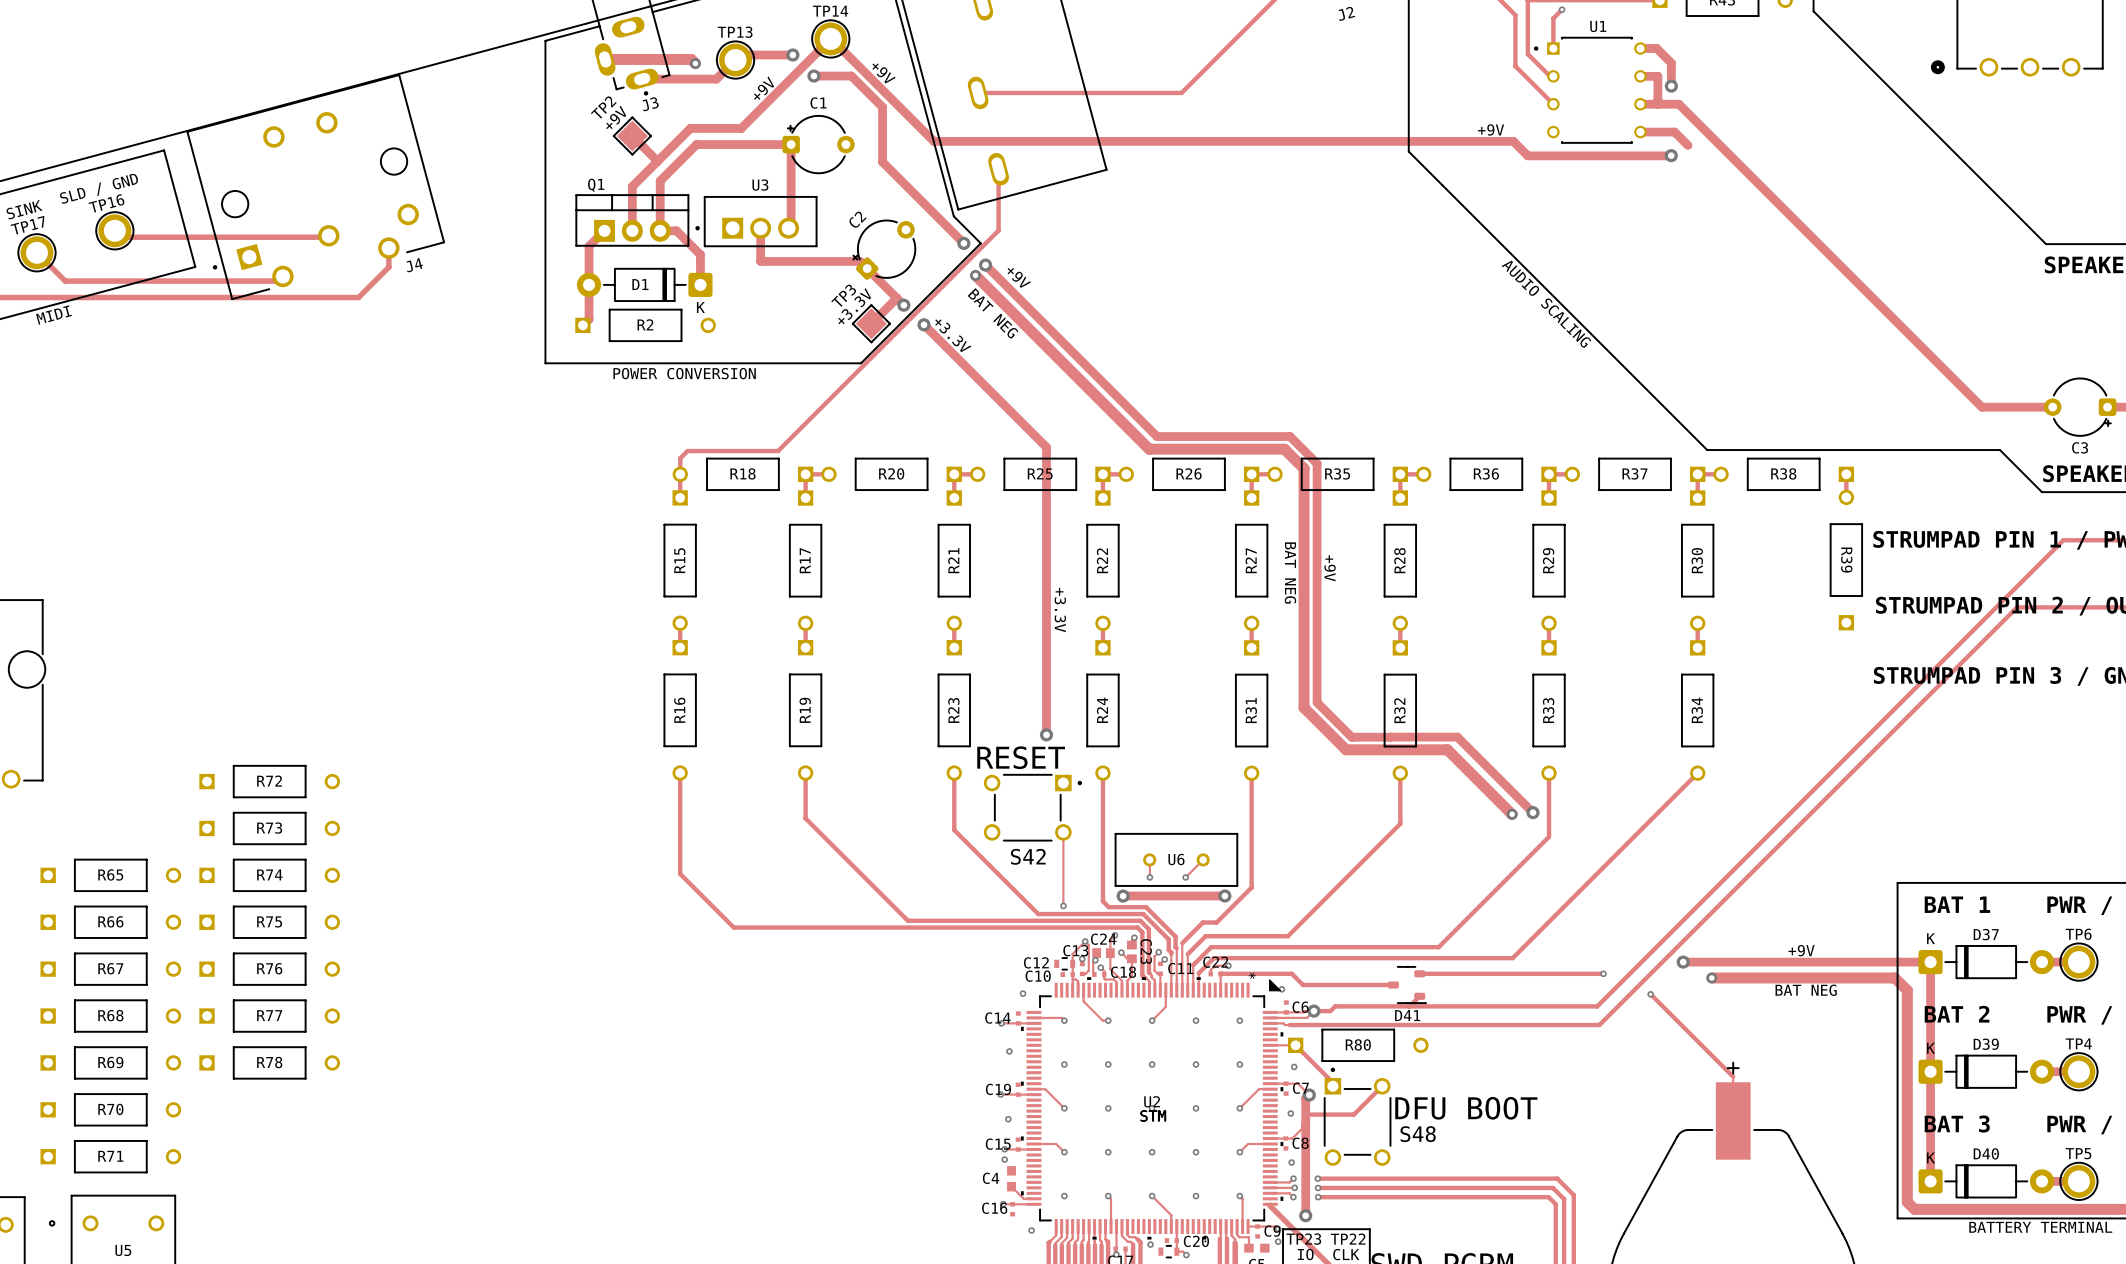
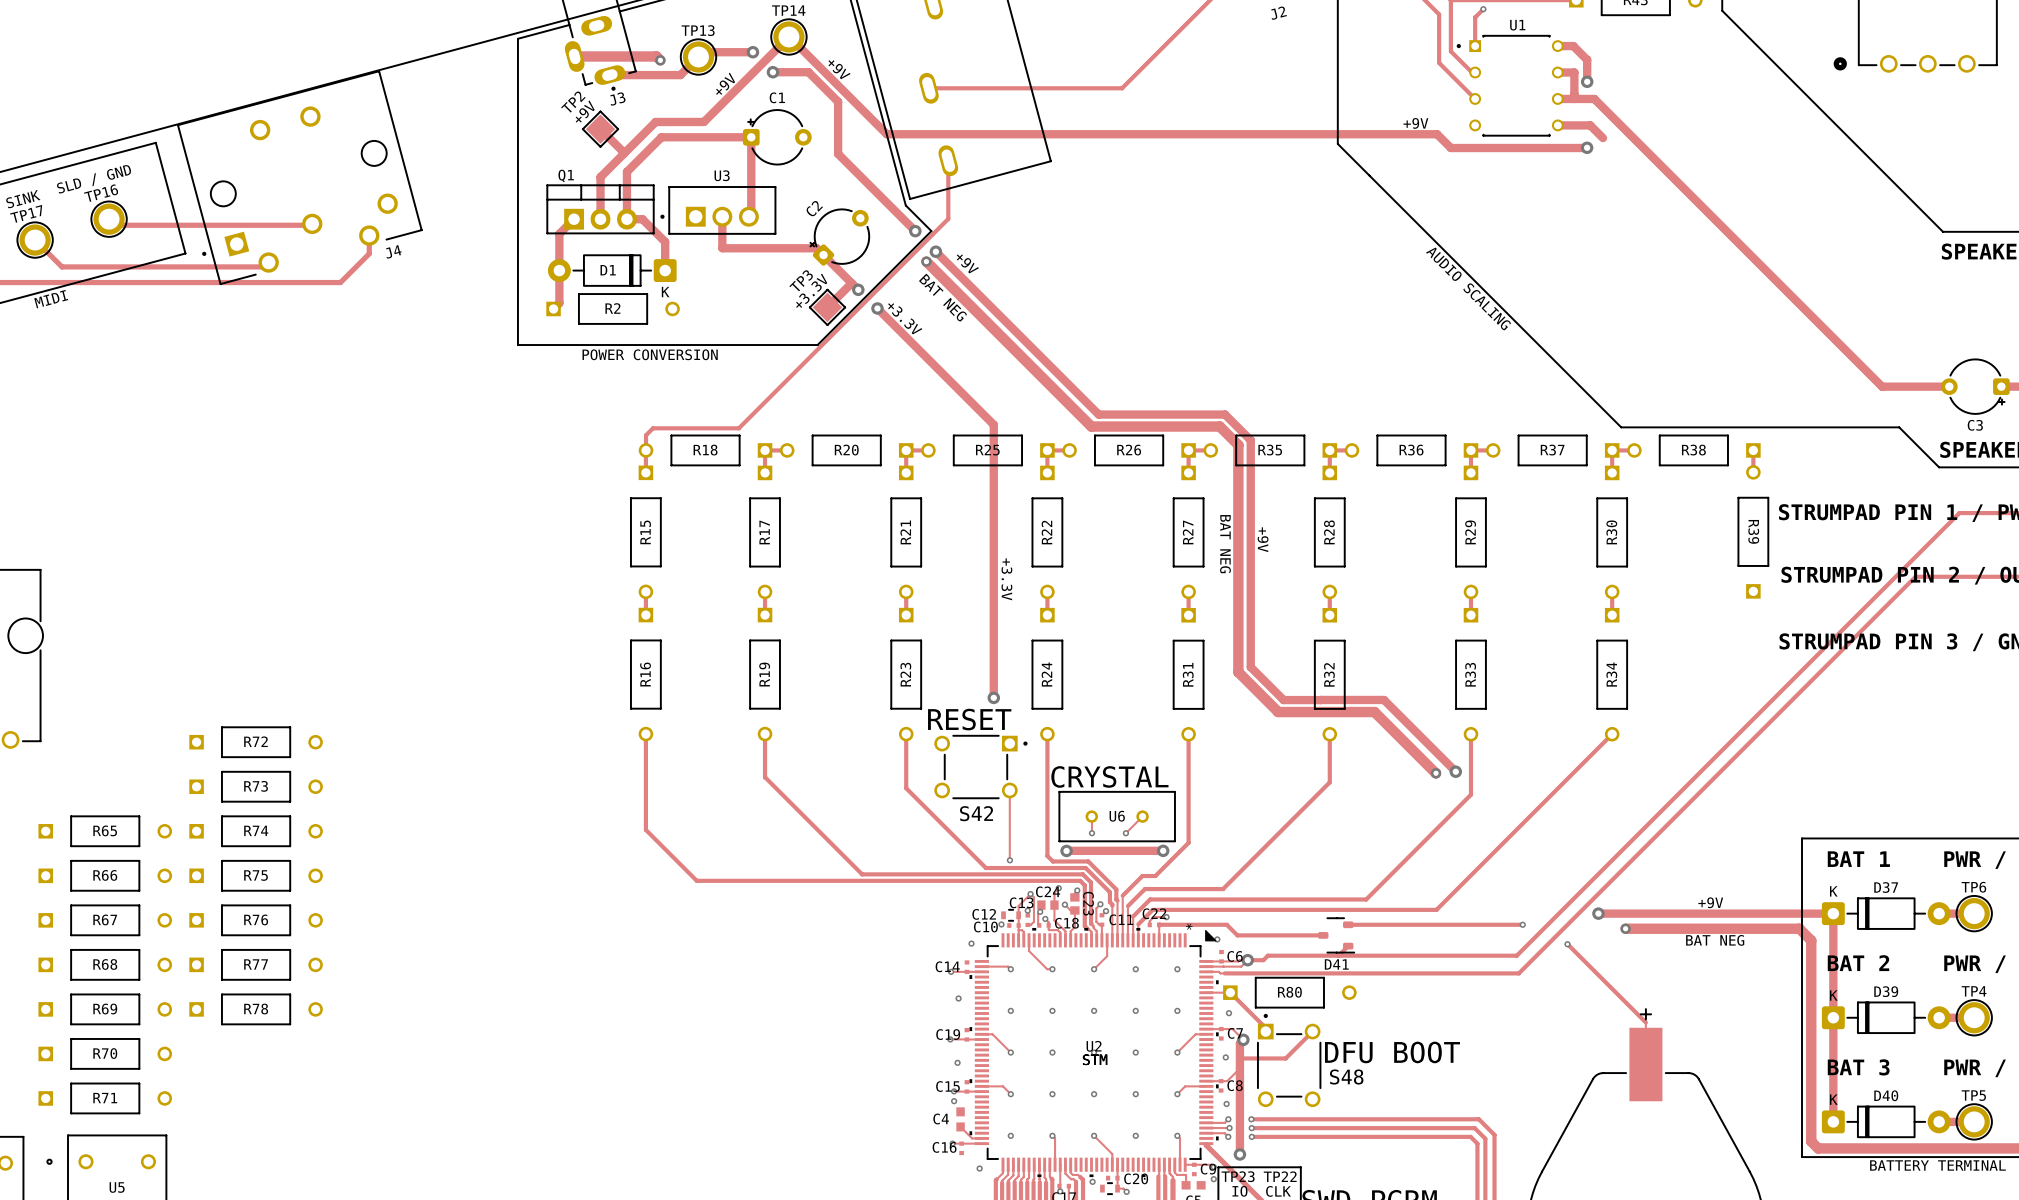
text: none -> CRYSTAL (1109, 776)
via: none -> (1001, 924)

